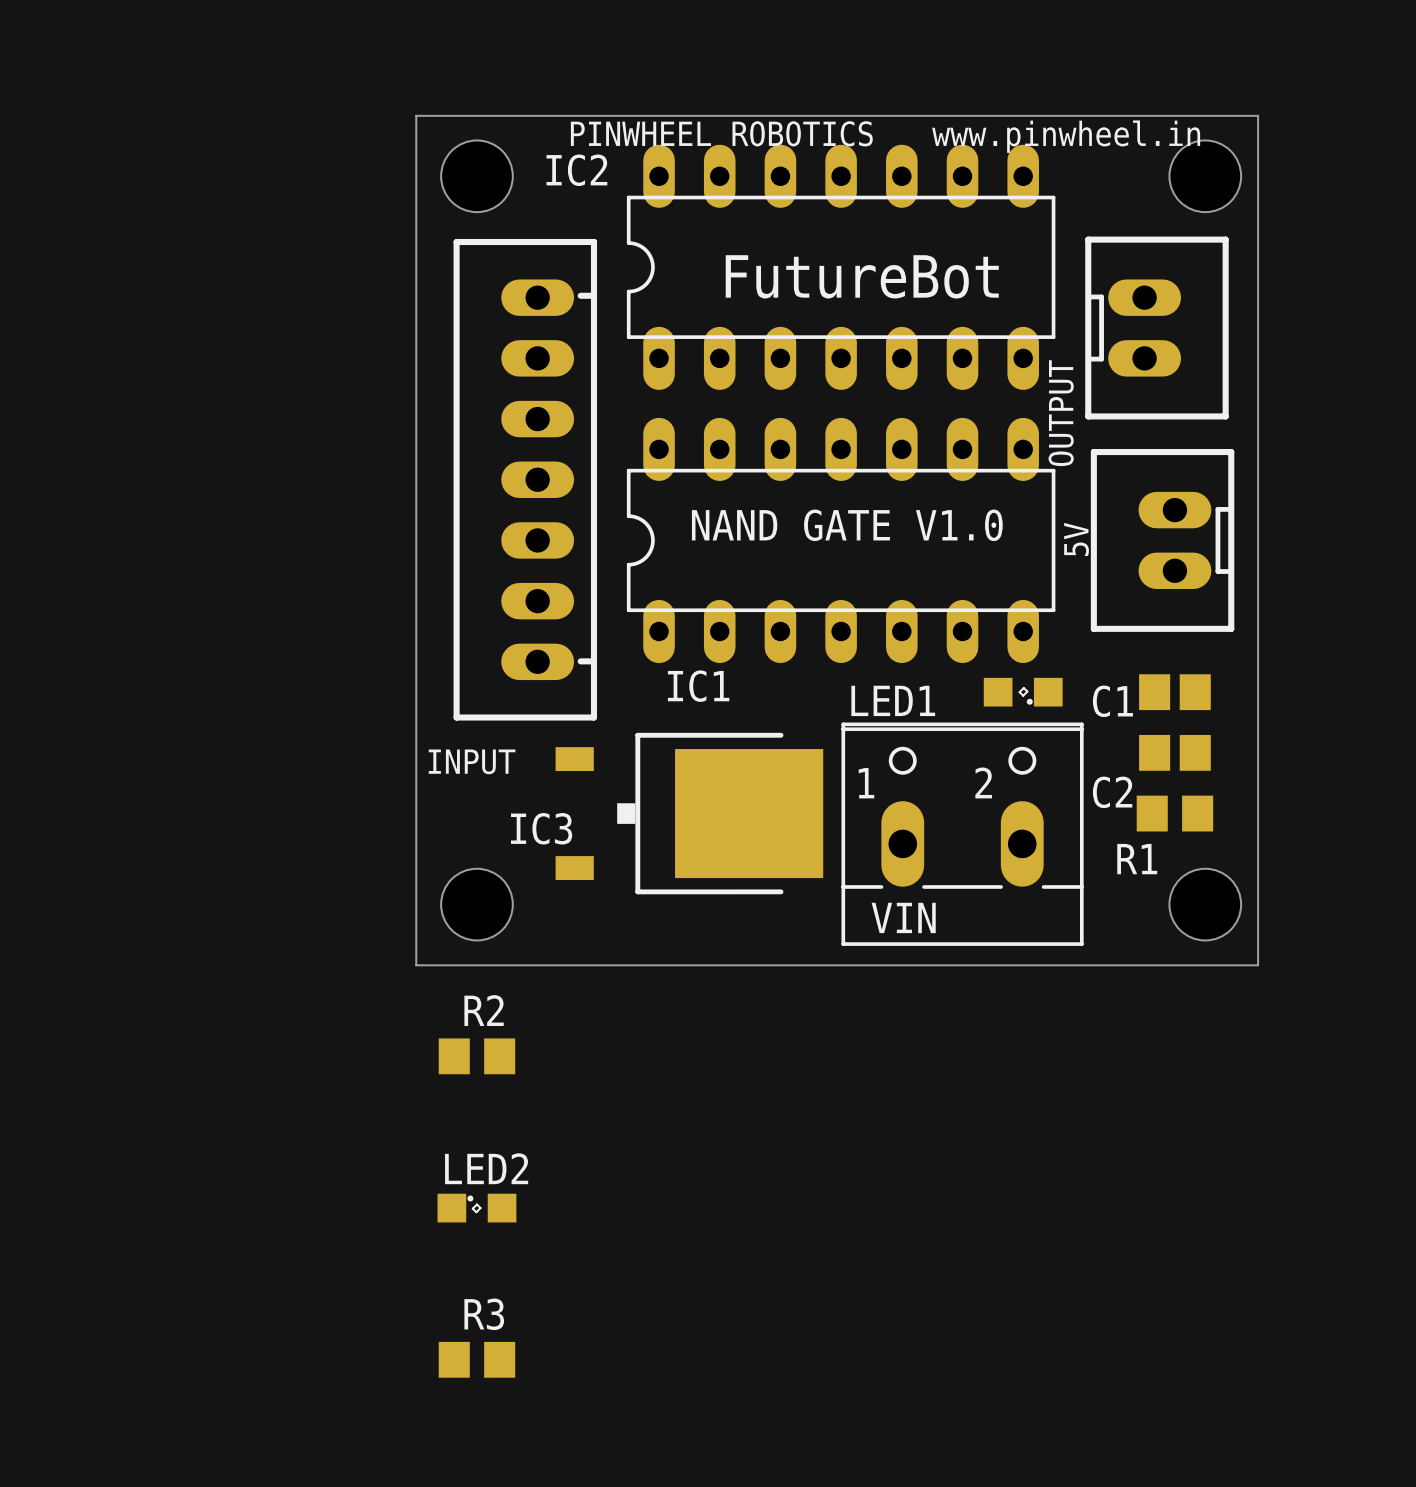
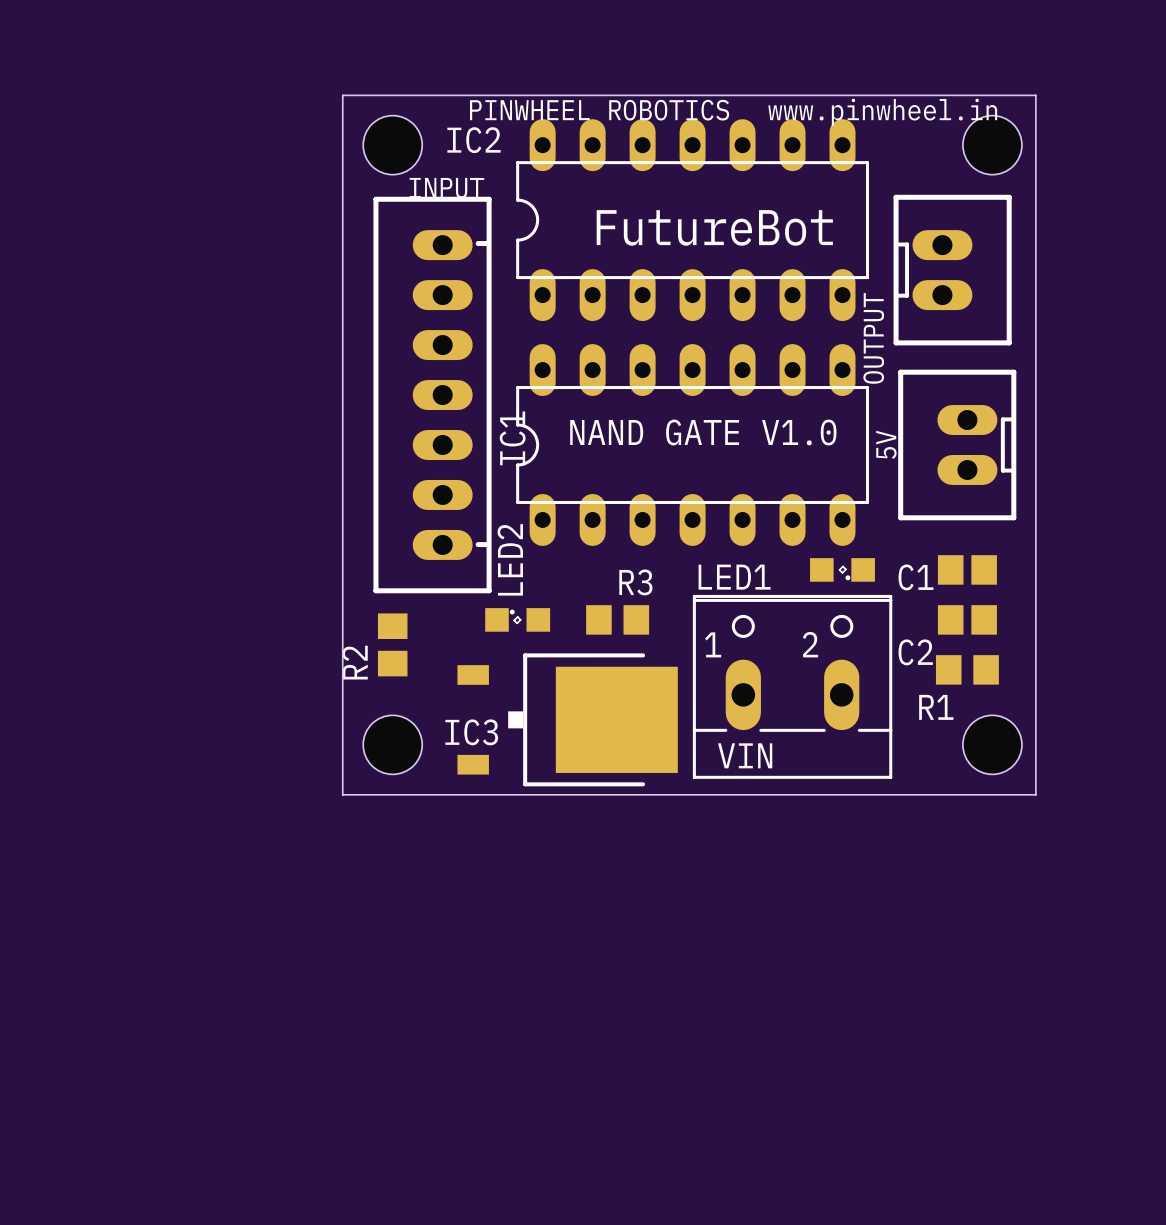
IC1 name rotation: 0° (698, 686) -> 90° counterclockwise (512, 438)
IC1 name position: IC1 (698, 686) -> IC1 (512, 438)
INPUT name position: INPUT (472, 761) -> INPUT (446, 188)
IC3 position: (689, 813) -> (567, 719)
IC3 name position: IC3 (541, 828) -> IC3 (471, 732)
R2 name position: R2 (484, 1010) -> R2 (355, 662)
R2 rotation: 0° (476, 1056) -> 90° clockwise (392, 644)
R2 position: (476, 1056) -> (392, 644)
LED2 name rotation: 0° (486, 1168) -> 90° counterclockwise (510, 559)
LED2 position: (476, 1208) -> (517, 619)
R3 name position: R3 (484, 1314) -> R3 (635, 582)
R3 position: (476, 1359) -> (617, 619)

